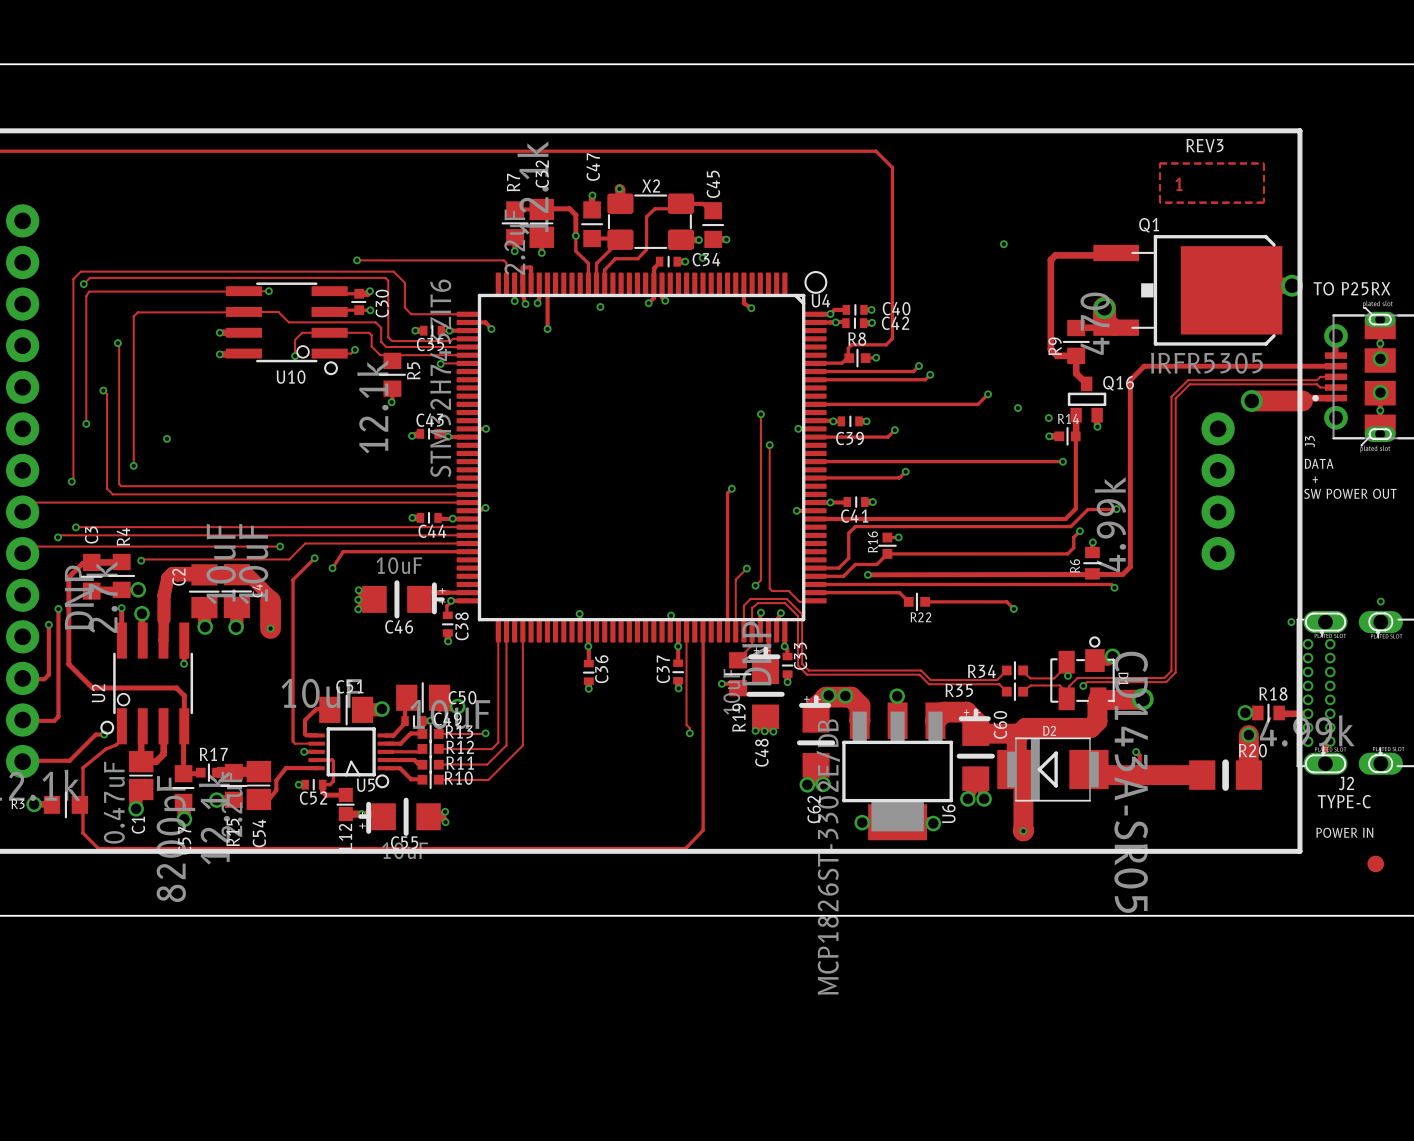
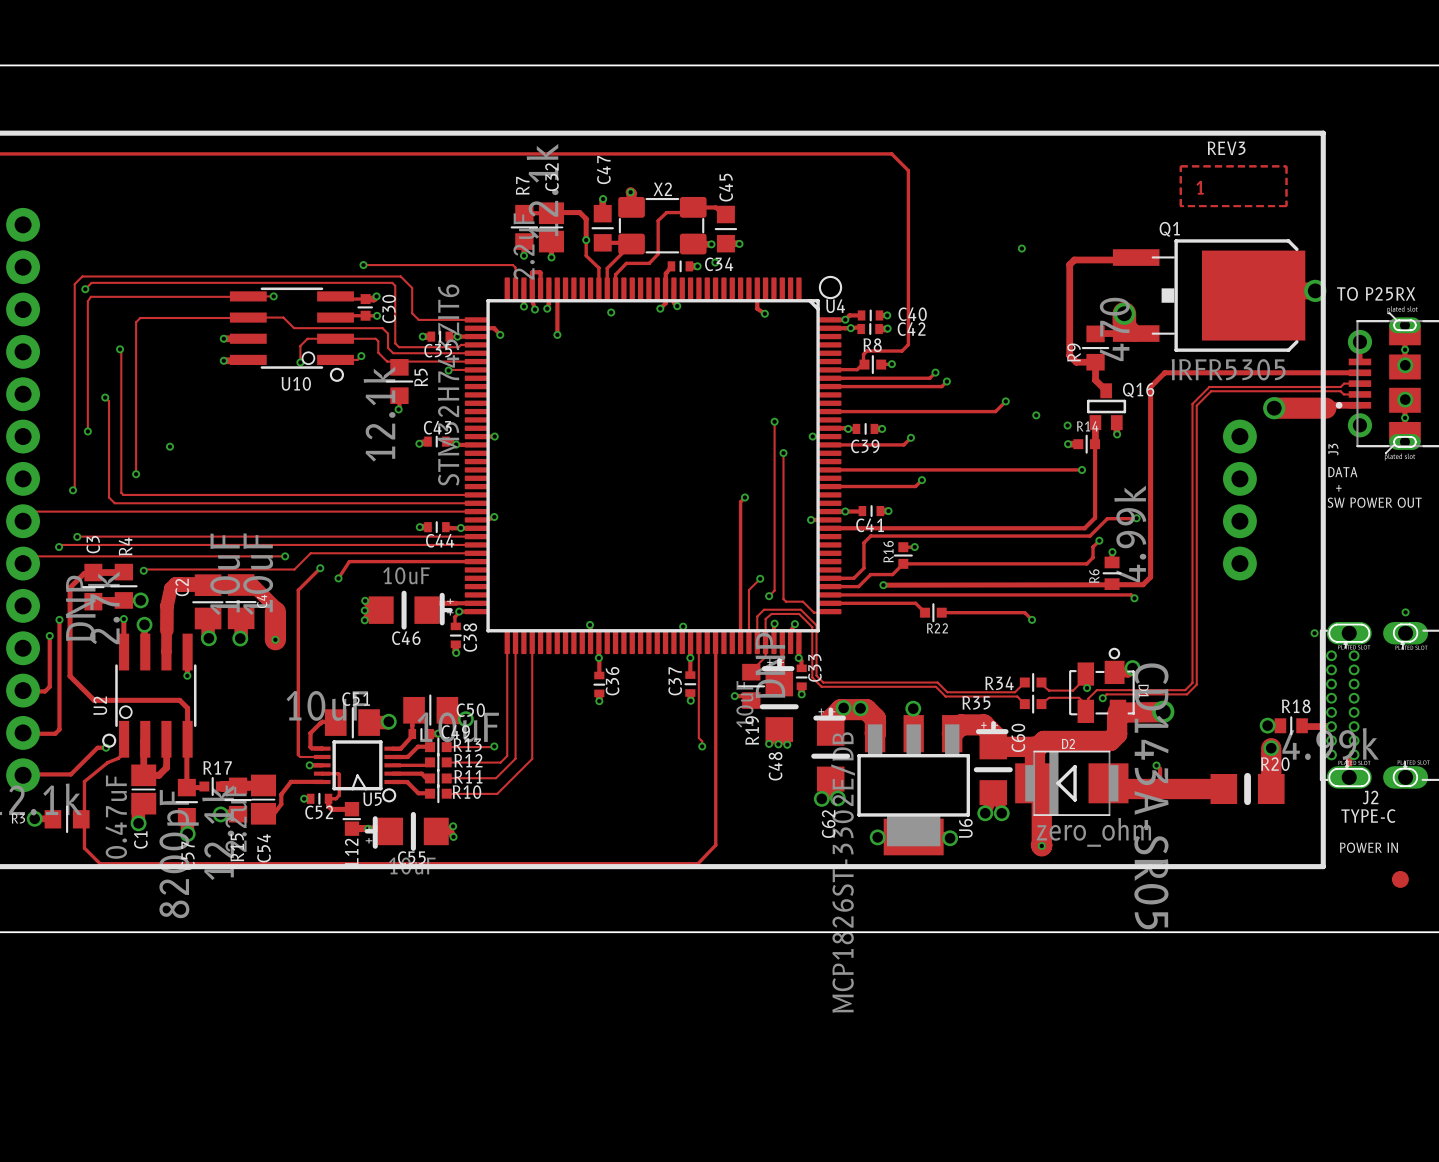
D2 value: none -> zero_ohm (1093, 832)

